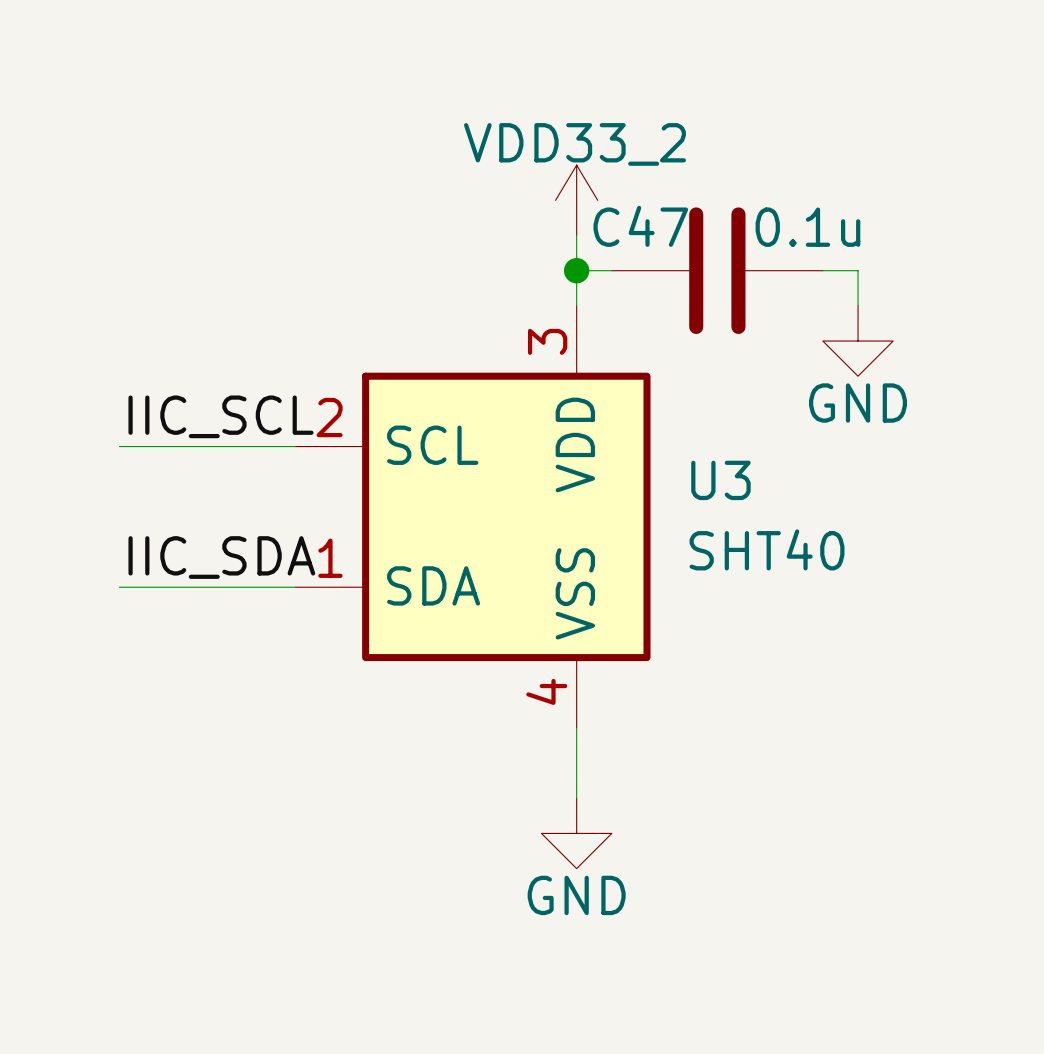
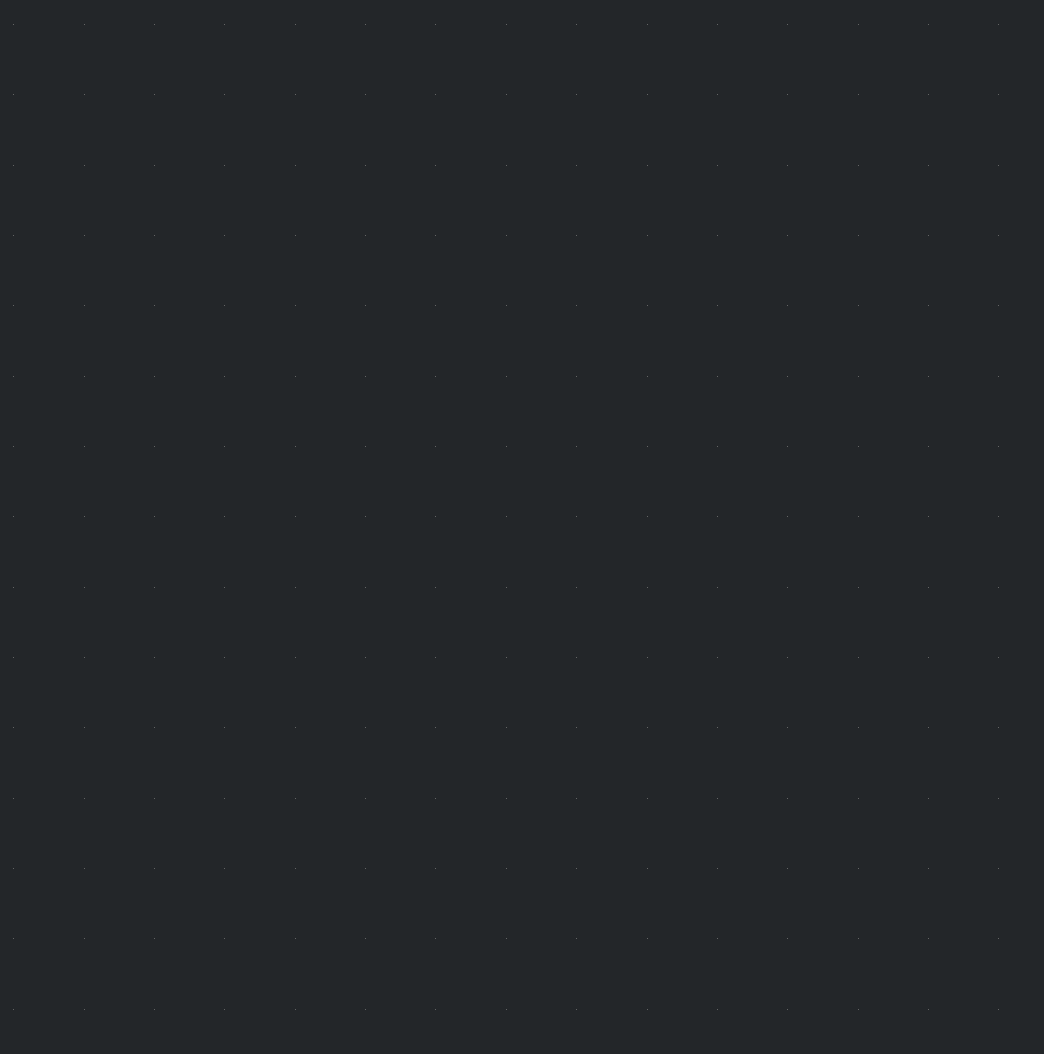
power symbol: VDD33_2 (576, 200) -> none
wire: (576, 235) (576, 305) -> none
wire: (576, 270) (611, 270) -> none
junction: (576, 270) -> none
C47: 0.1u (717, 270) -> none
wire: (822, 270) (858, 270) (858, 305) -> none
power symbol: GND (858, 341) -> none
label: IIC_SCL (221, 416) -> none
wire: (119, 446) (295, 446) -> none
U3: SHT40 (472, 516) -> none
label: IIC_SDA (221, 557) -> none
wire: (119, 587) (295, 587) -> none
wire: (576, 727) (576, 798) -> none
power symbol: GND (576, 833) -> none

